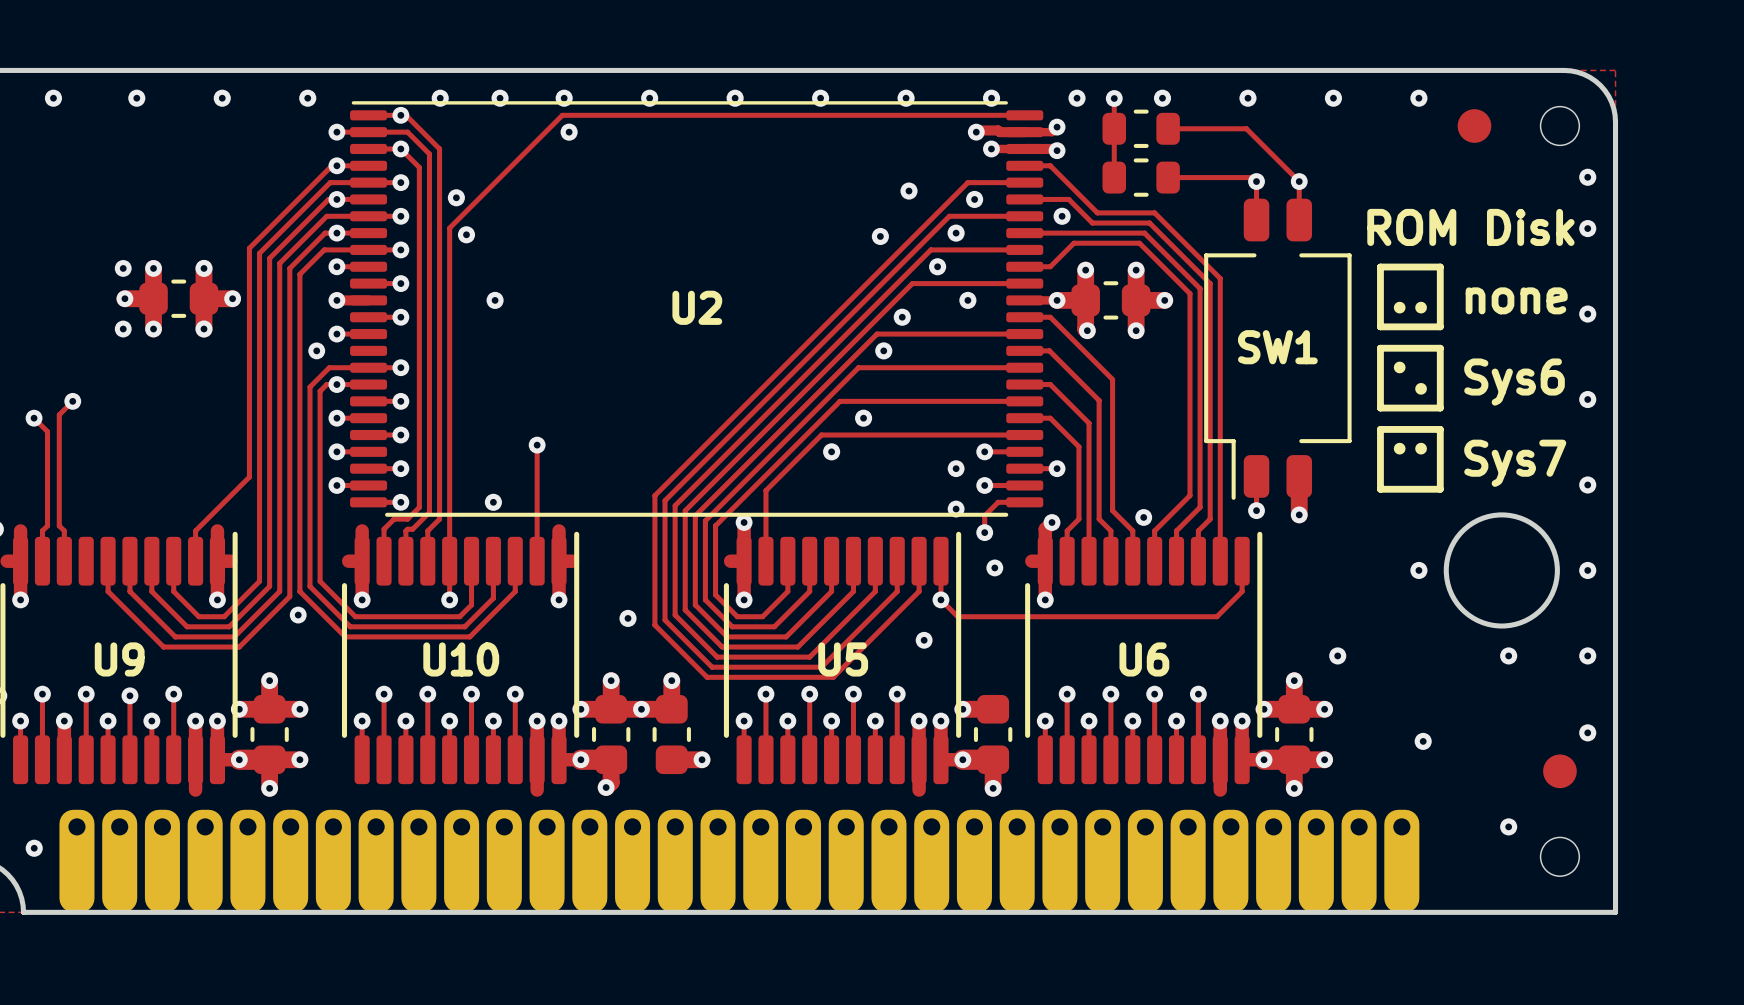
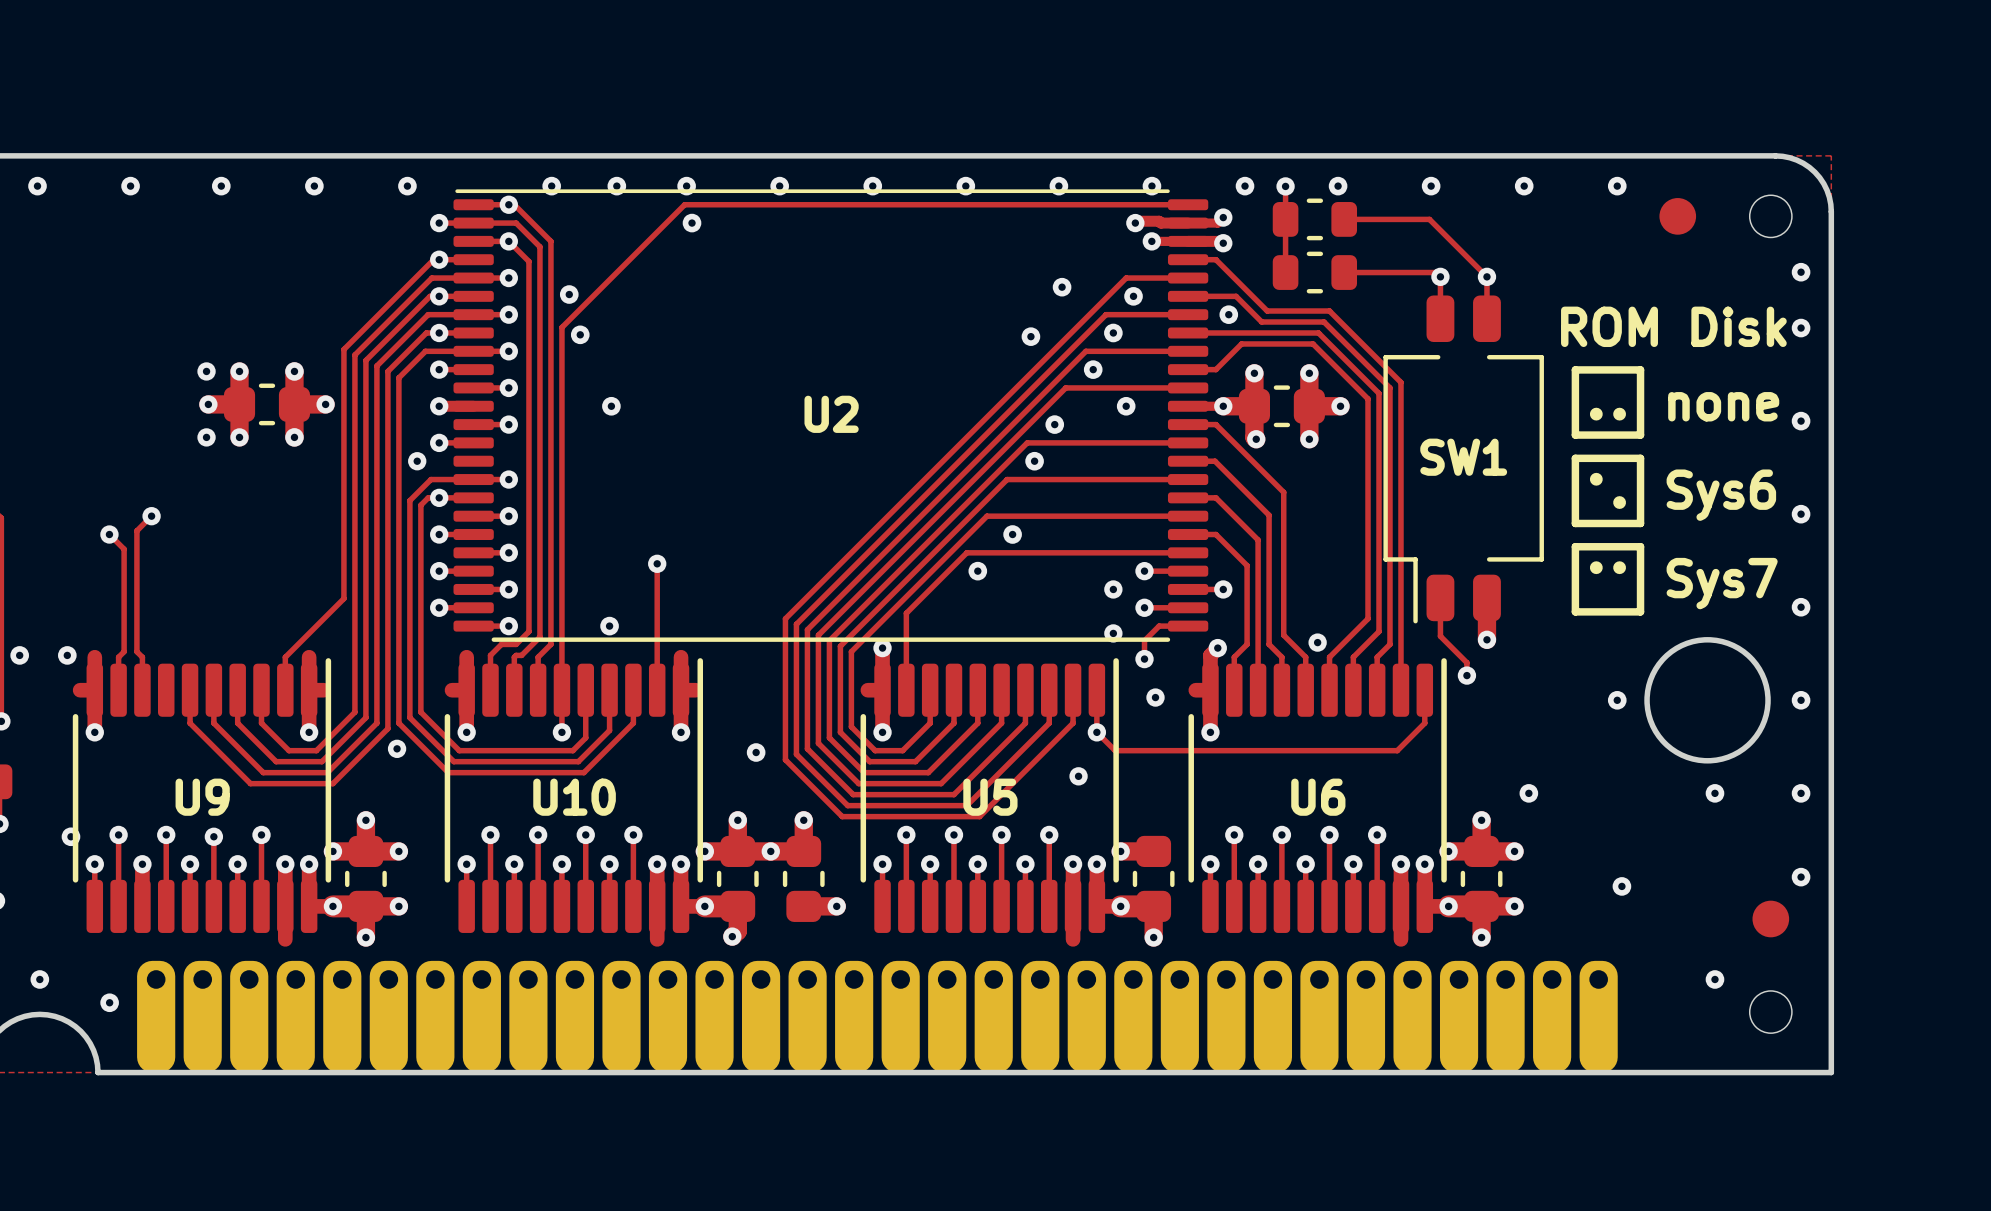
track: none -> (1440, 635) (1466, 662) (1466, 675)
via position: (1256, 510) -> (1466, 675)

